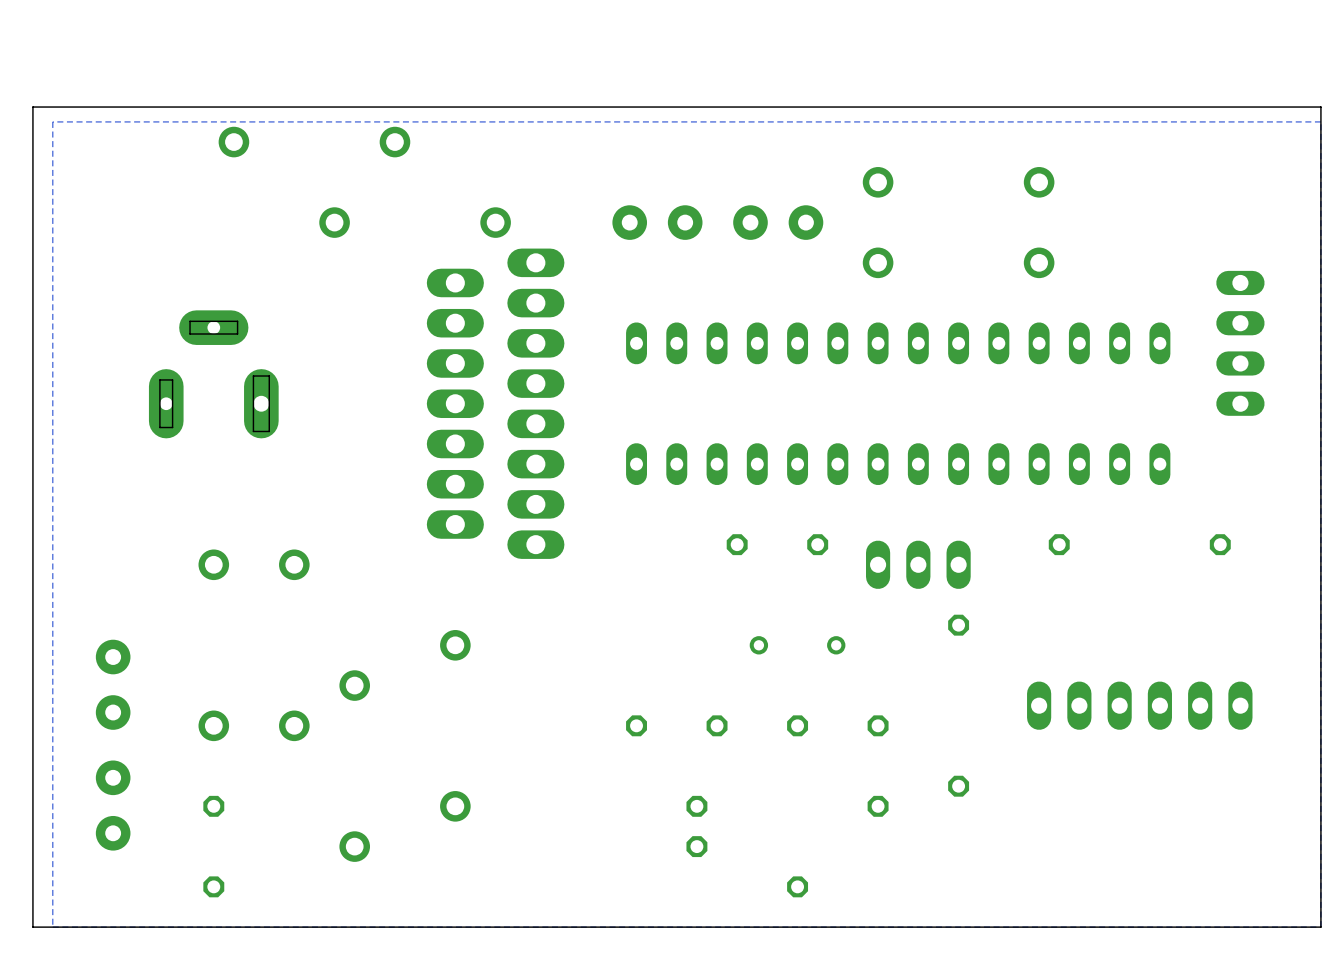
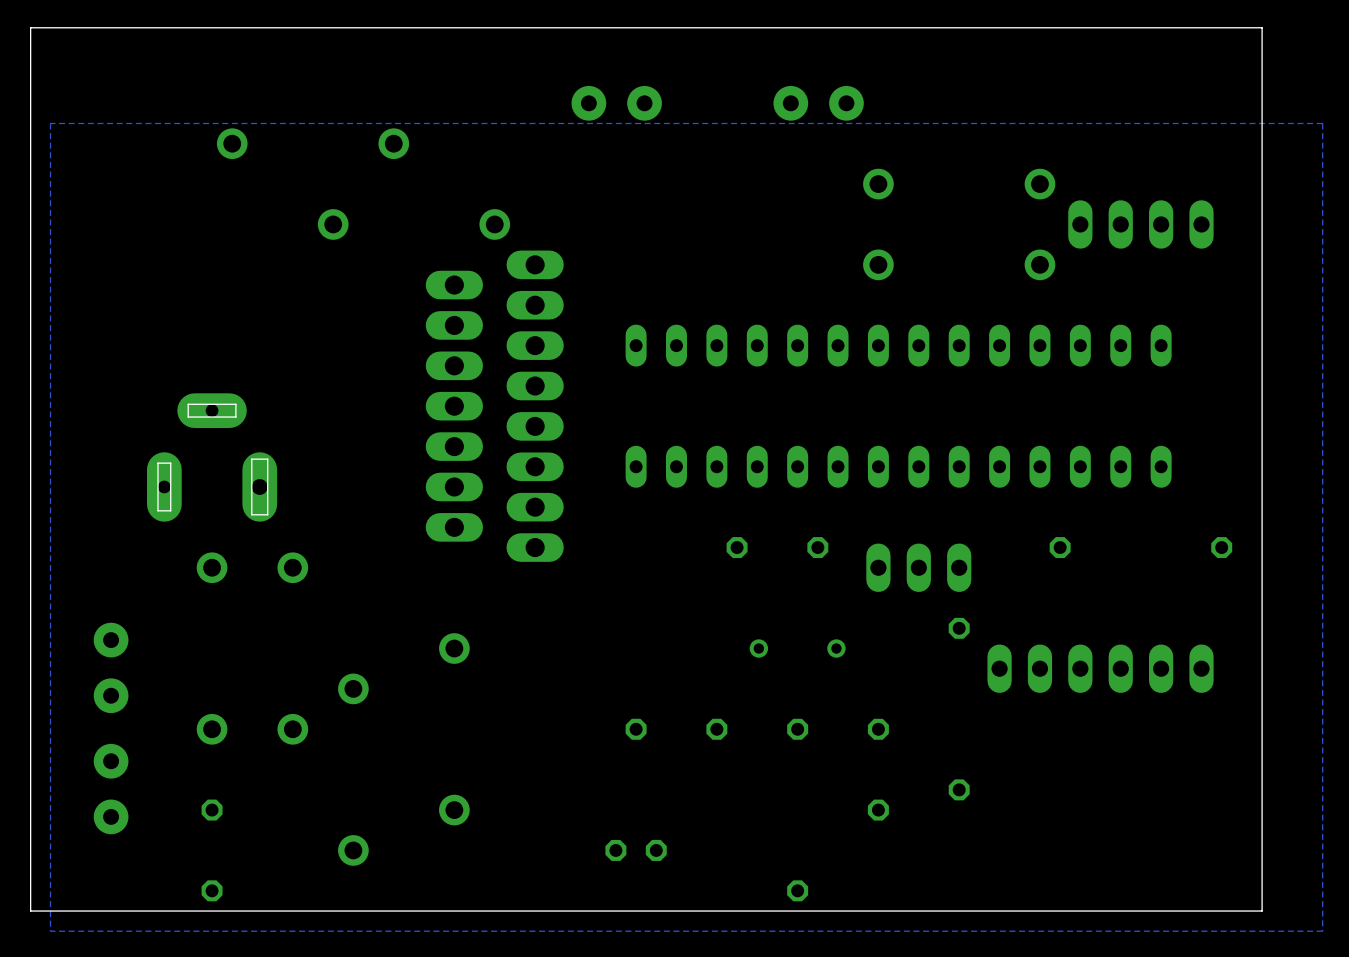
part: none -> (616, 103)
part: none -> (818, 103)
board edge: (32, 107) (1320, 107) (1320, 927) (32, 927) (32, 906) -> (30, 108) (30, 27) (1262, 27) (1262, 911) (30, 911)
part: (657, 222) -> none
part: (778, 222) -> none
part rotation: 0° (1240, 343) -> 90° clockwise (1140, 224)
part position: (1240, 343) -> (1140, 224)
part position: (213, 374) -> (212, 457)
part position: (113, 684) -> (111, 667)
part position: (1139, 705) -> (1100, 668)
part position: (113, 805) -> (111, 789)
part rotation: 0° (696, 826) -> 90° clockwise (636, 850)
part position: (696, 826) -> (636, 850)

